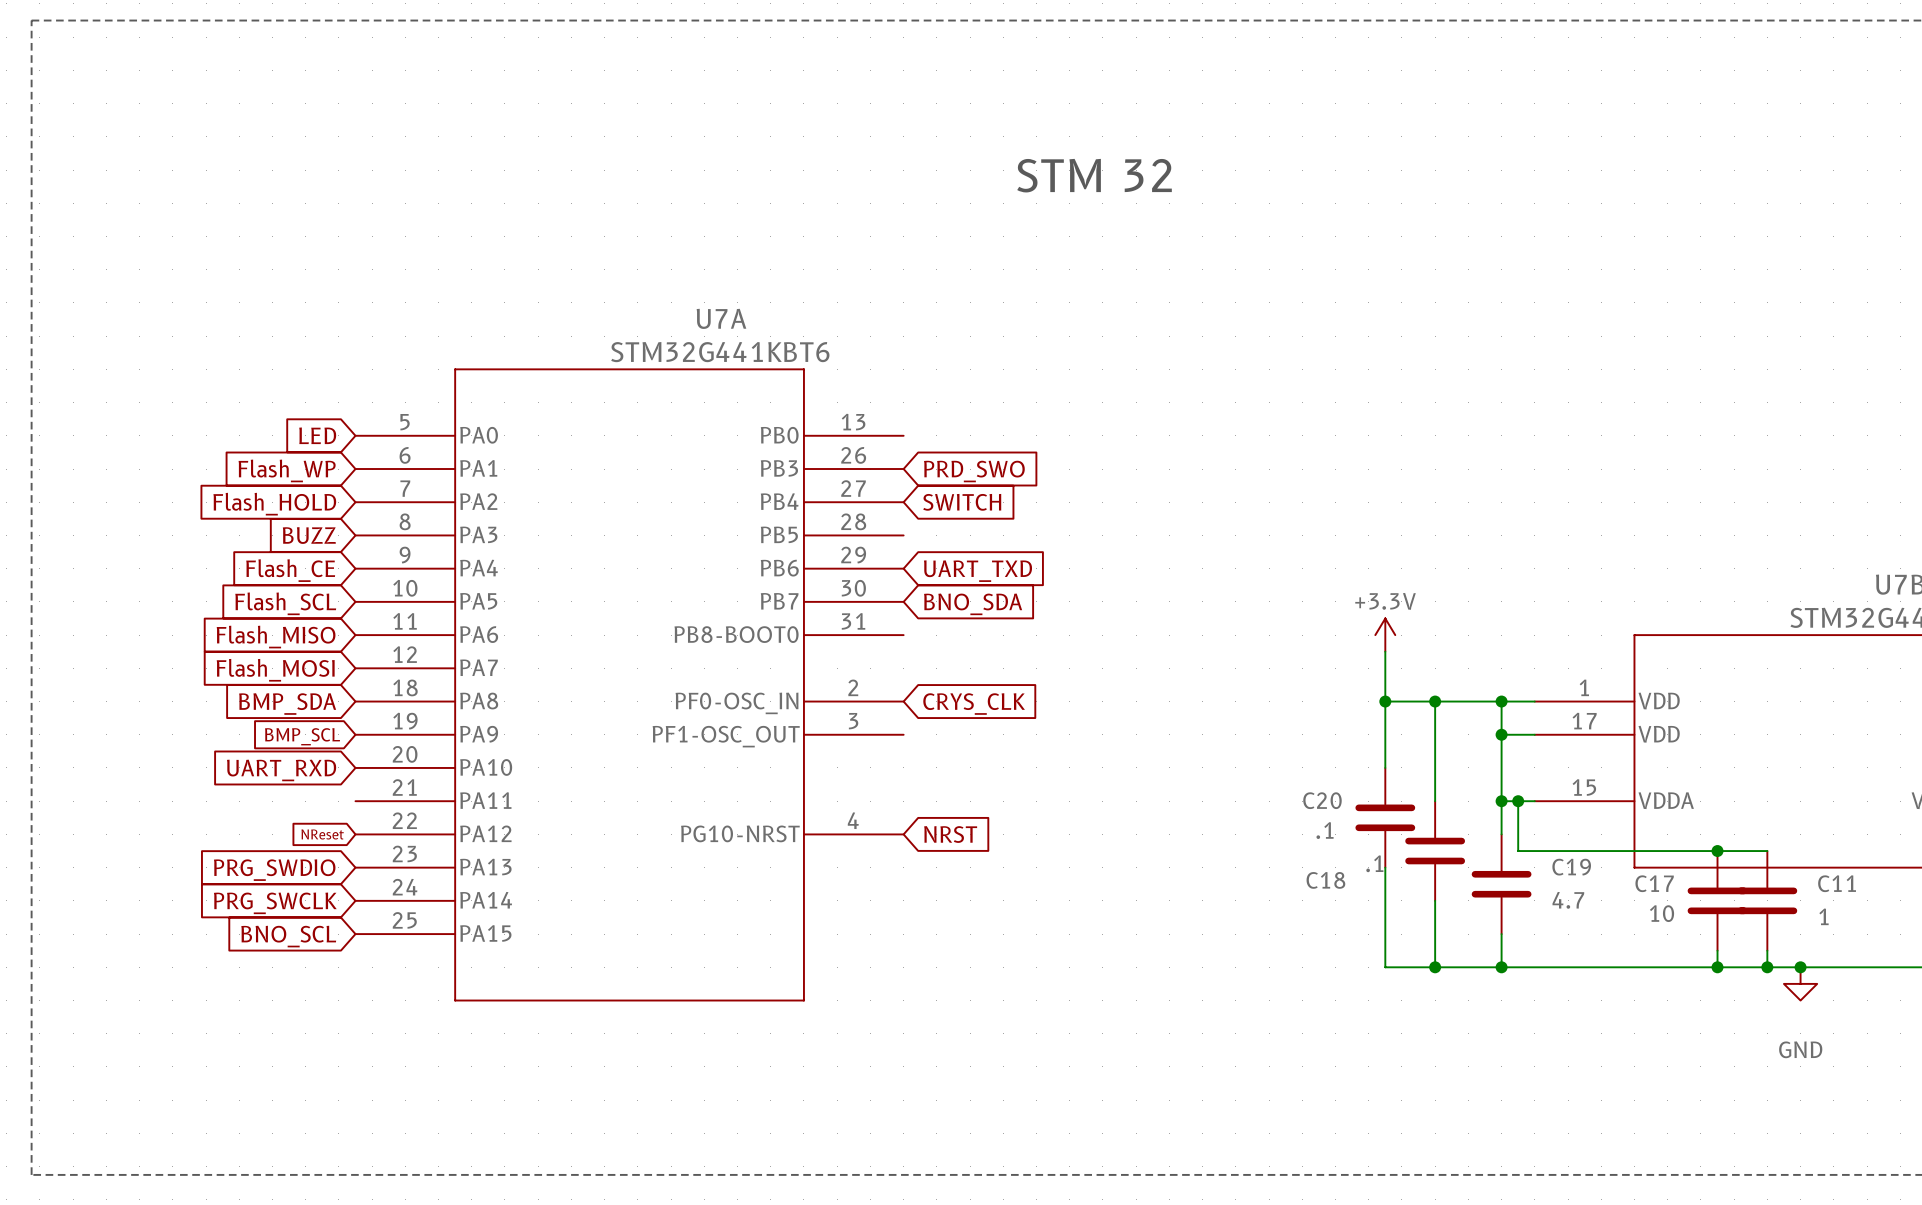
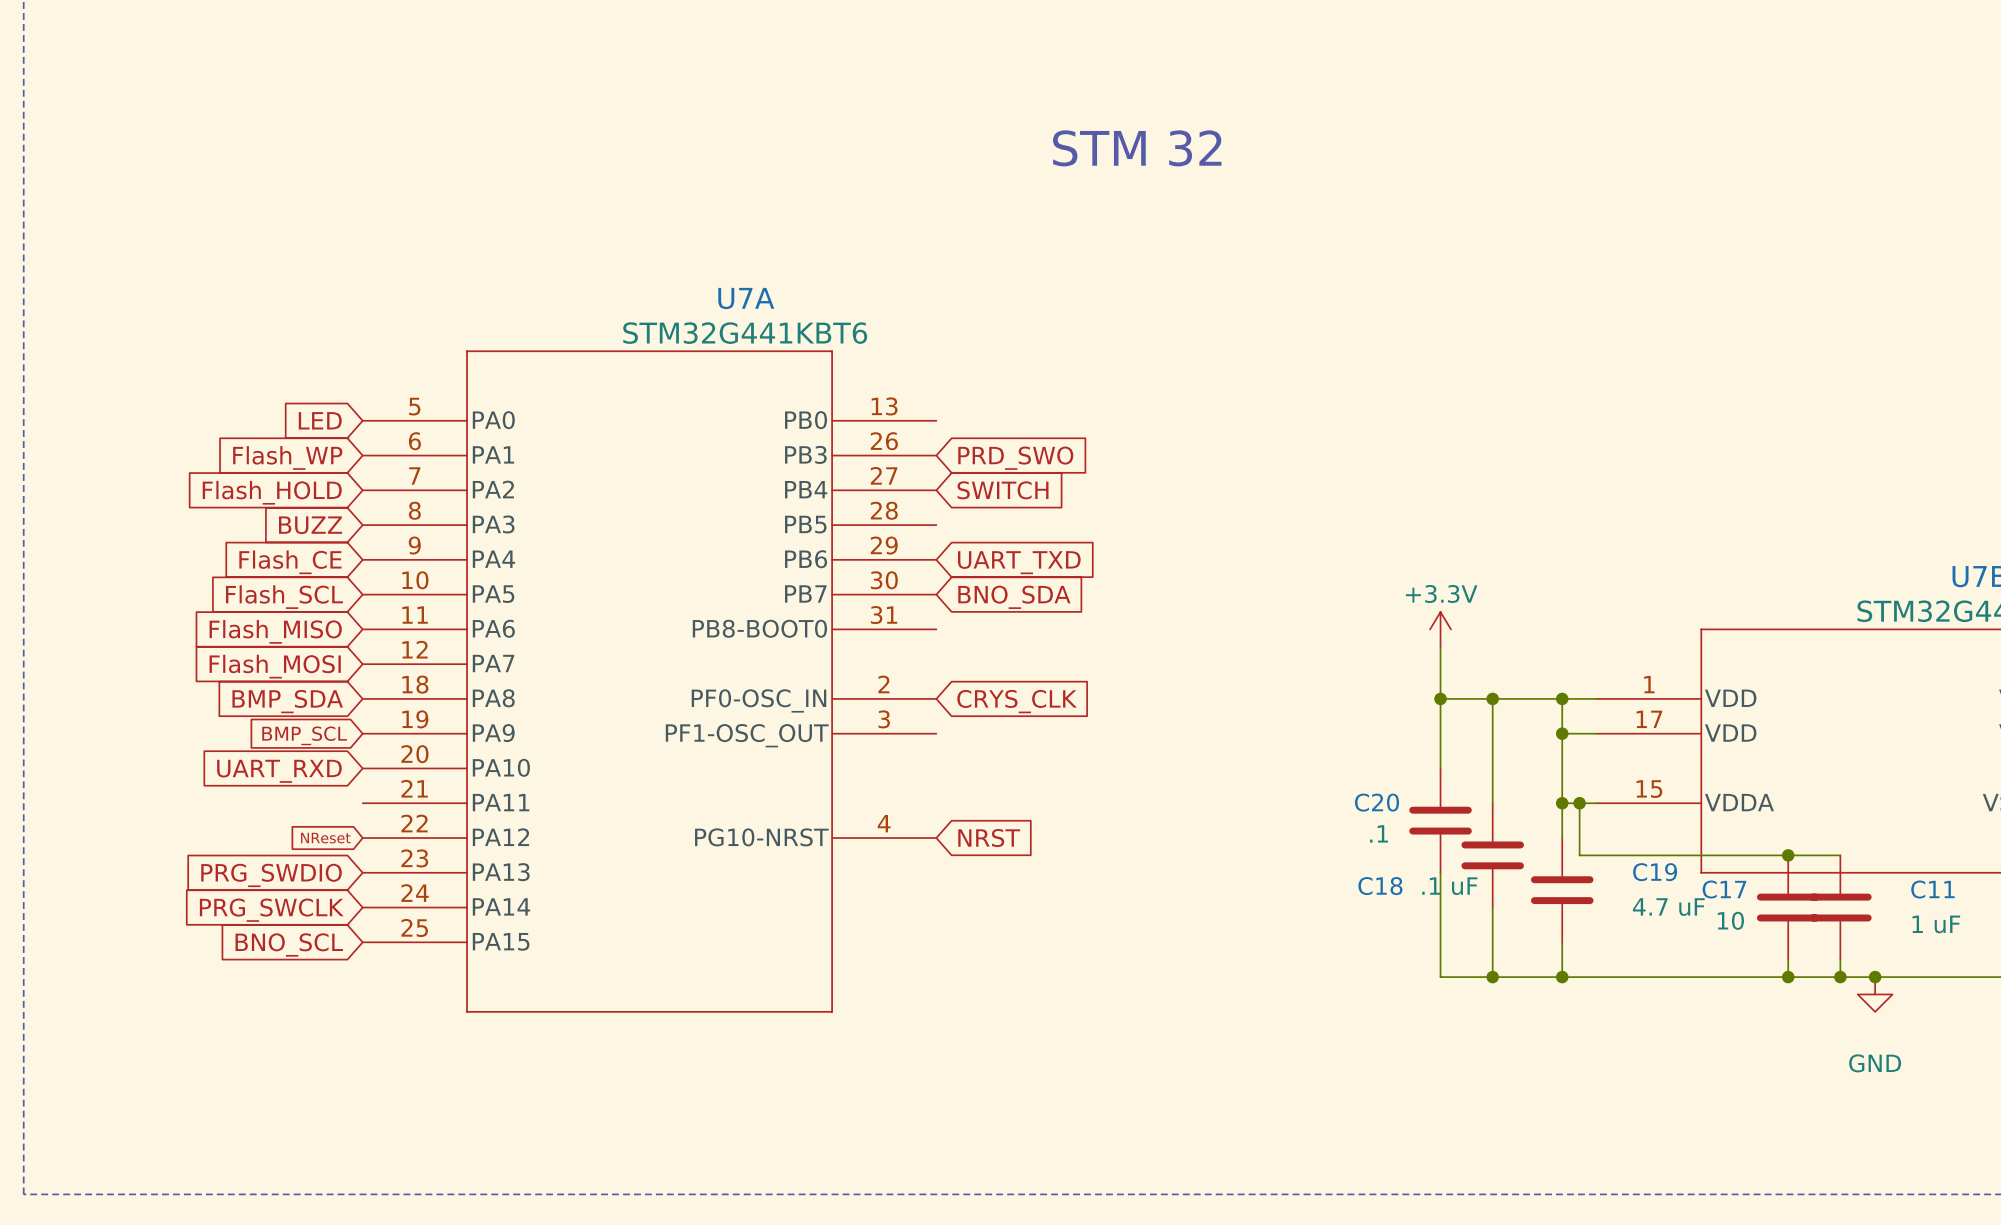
C18 value: .1 (1374, 863) -> .1 uF (1449, 886)
C19 name position: C19 (1571, 867) -> C19 (1655, 872)
C11 name position: C11 (1837, 883) -> C11 (1932, 889)
C19 value: 4.7 (1568, 900) -> 4.7 uF (1668, 907)
C11 value: 1 (1823, 916) -> 1 uF (1936, 924)

